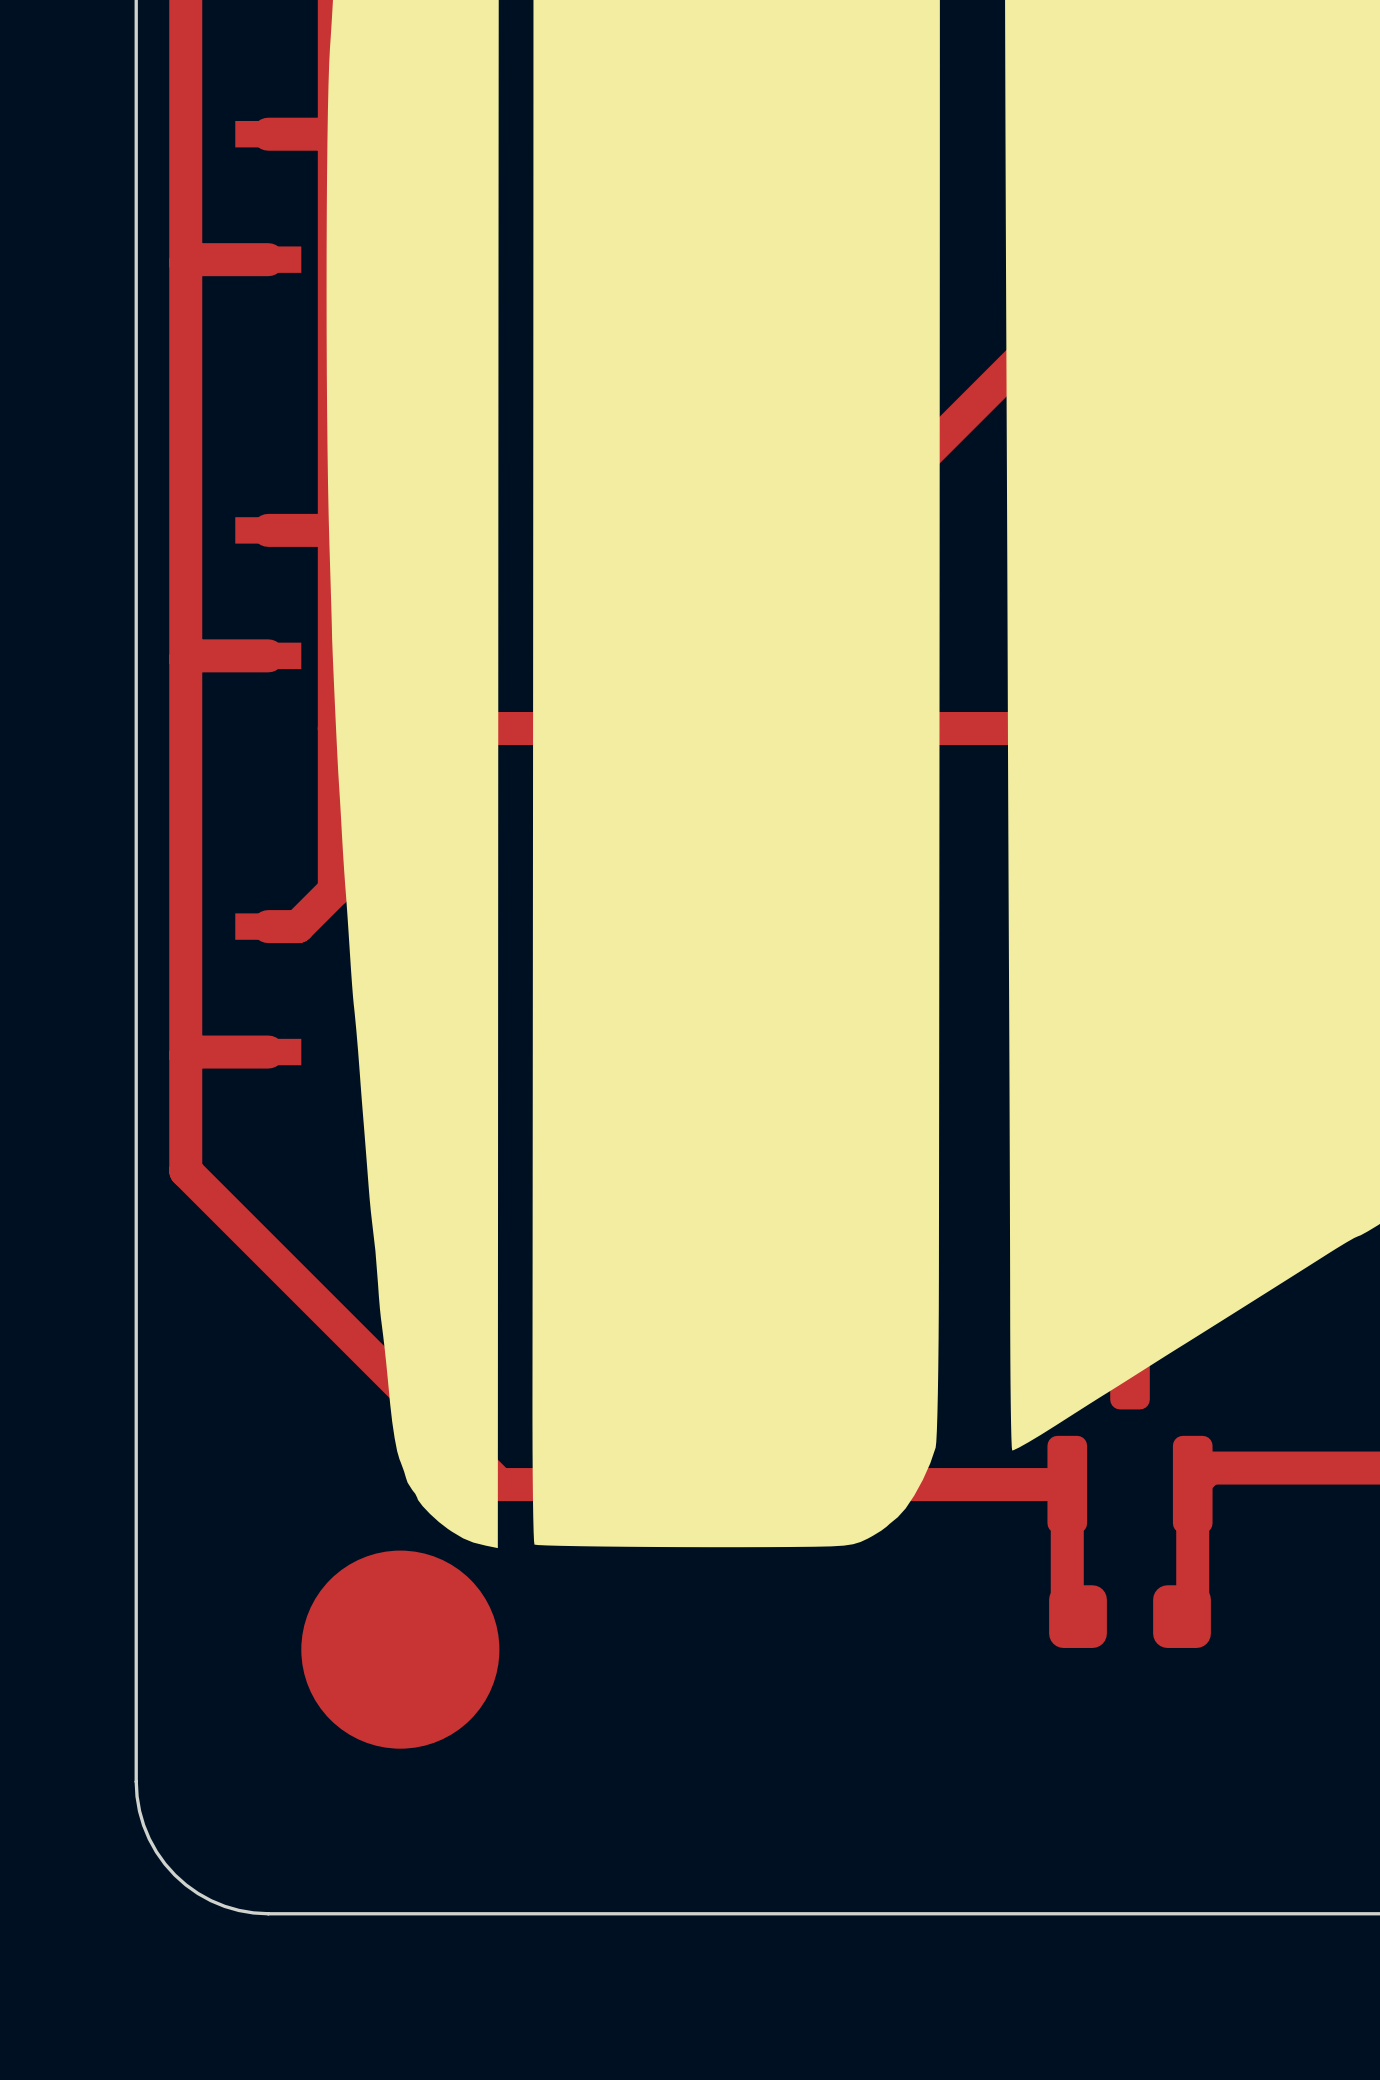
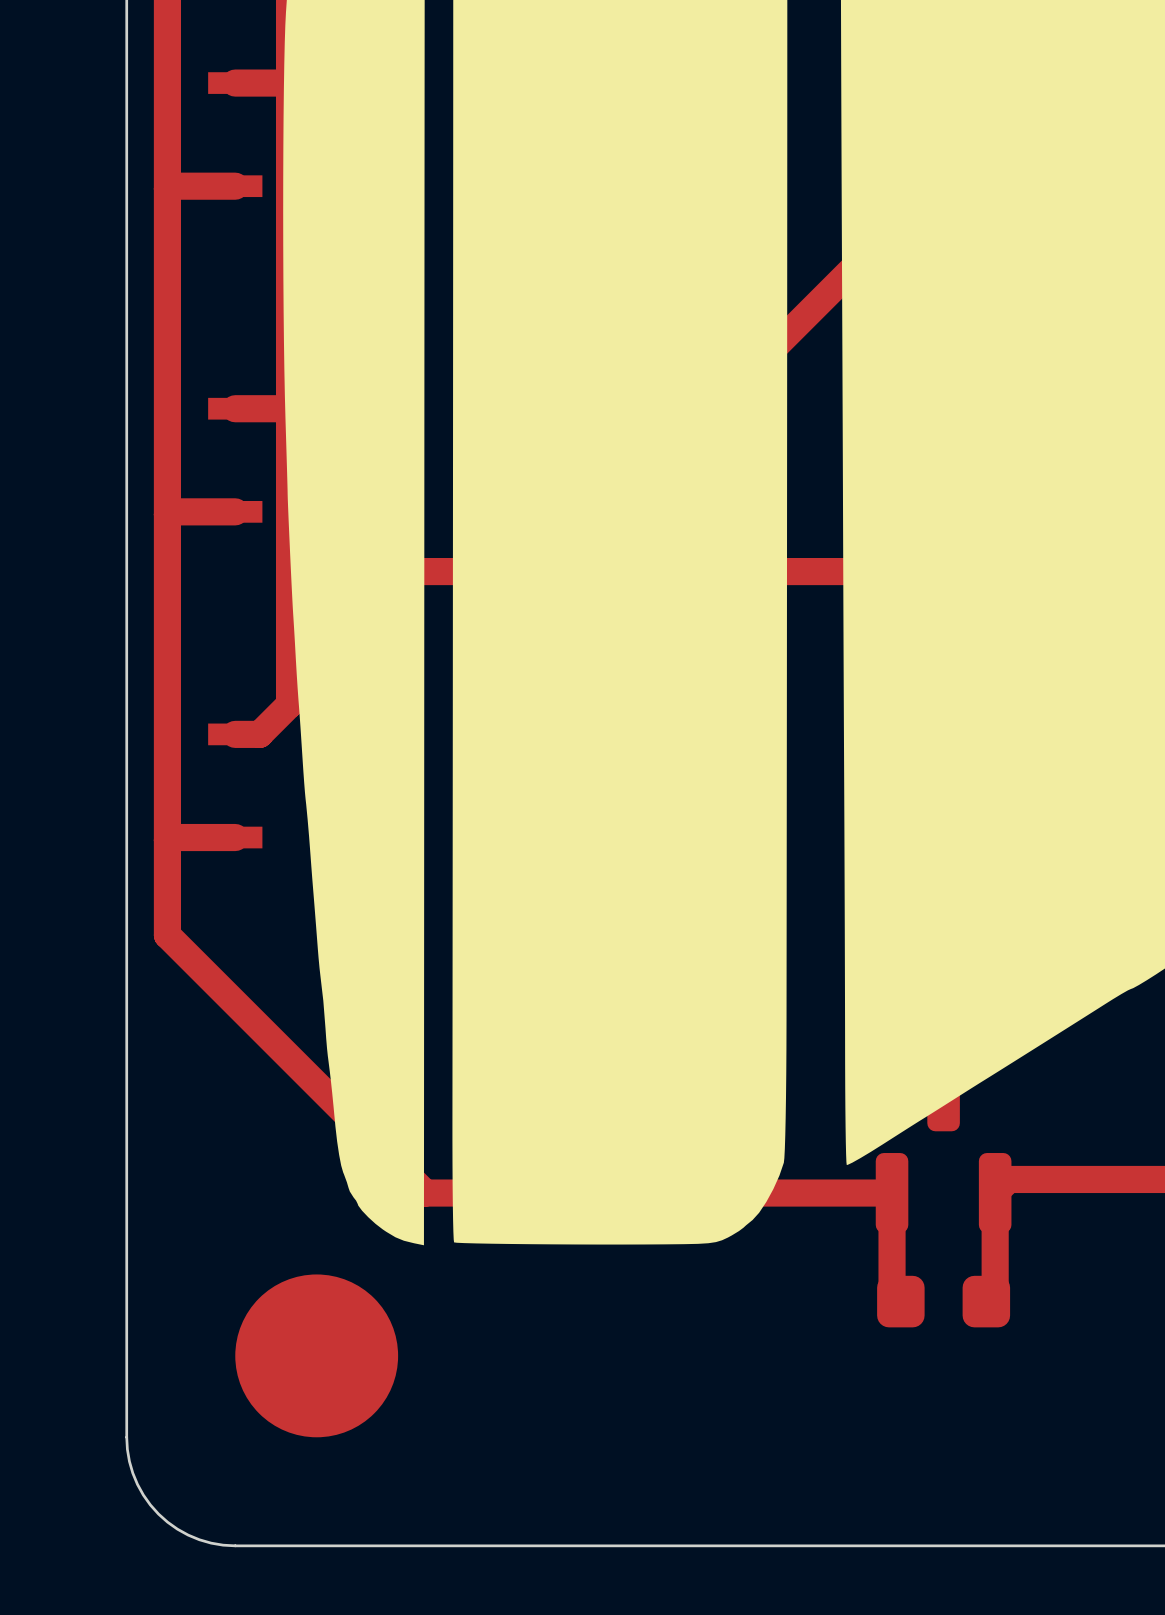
part position: (400, 1649) -> (316, 1355)

